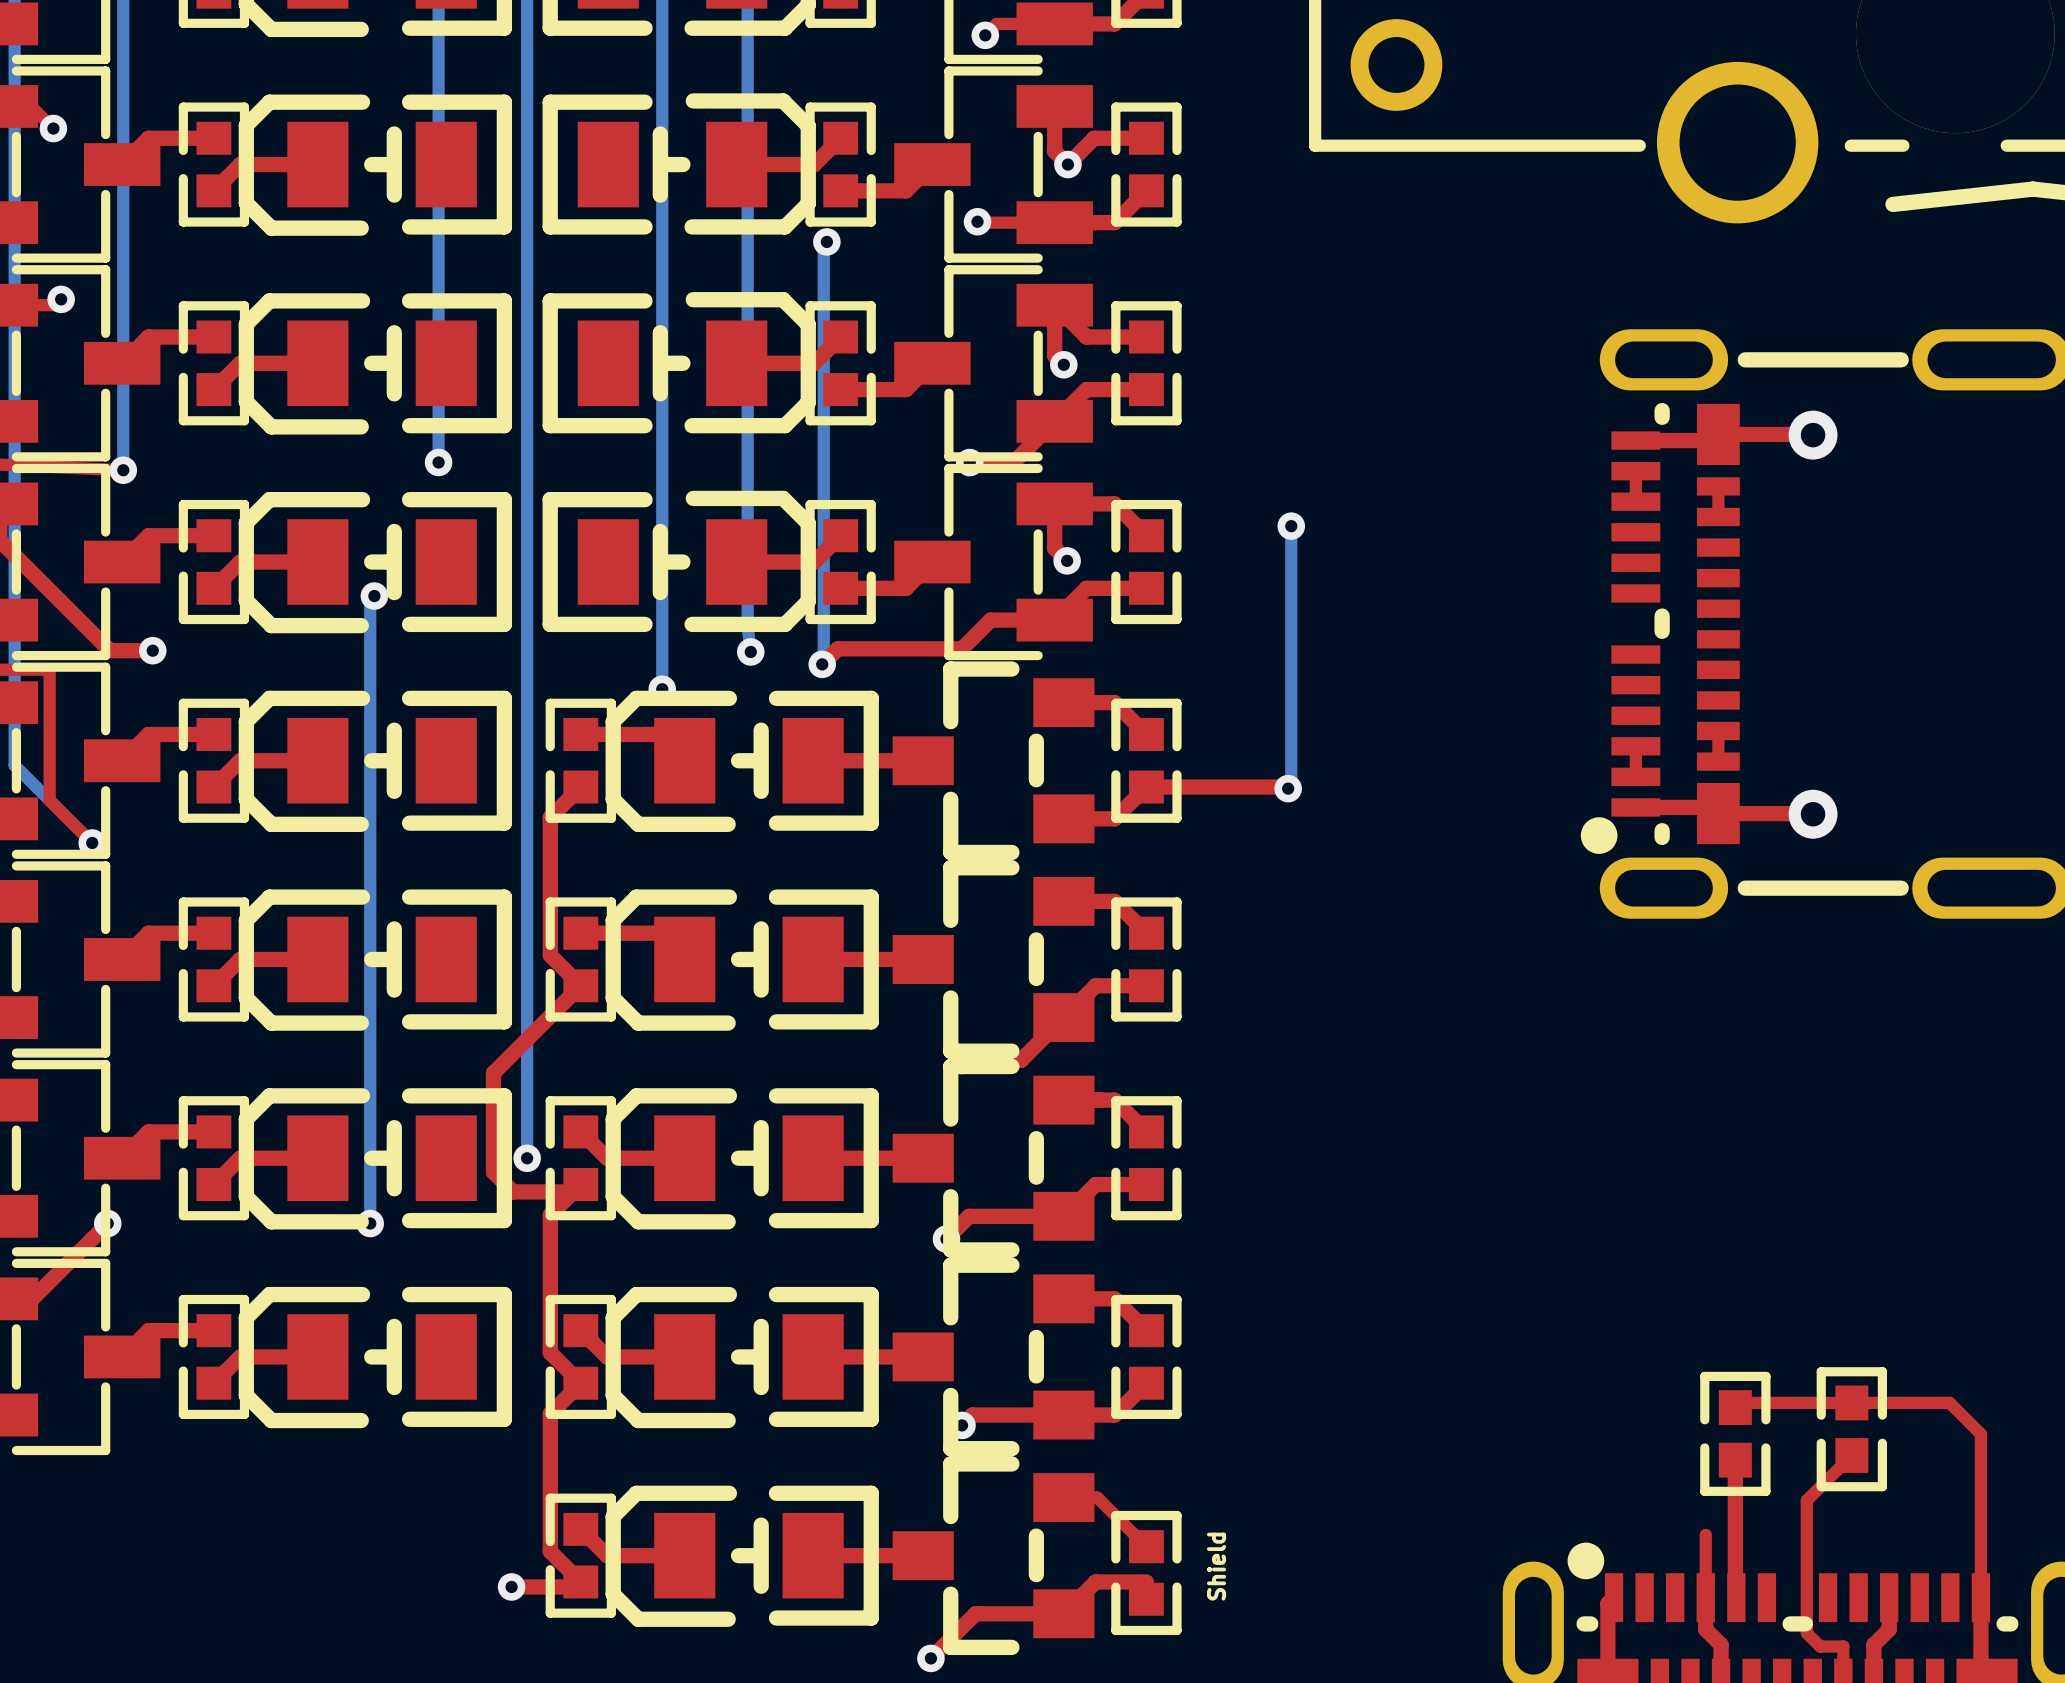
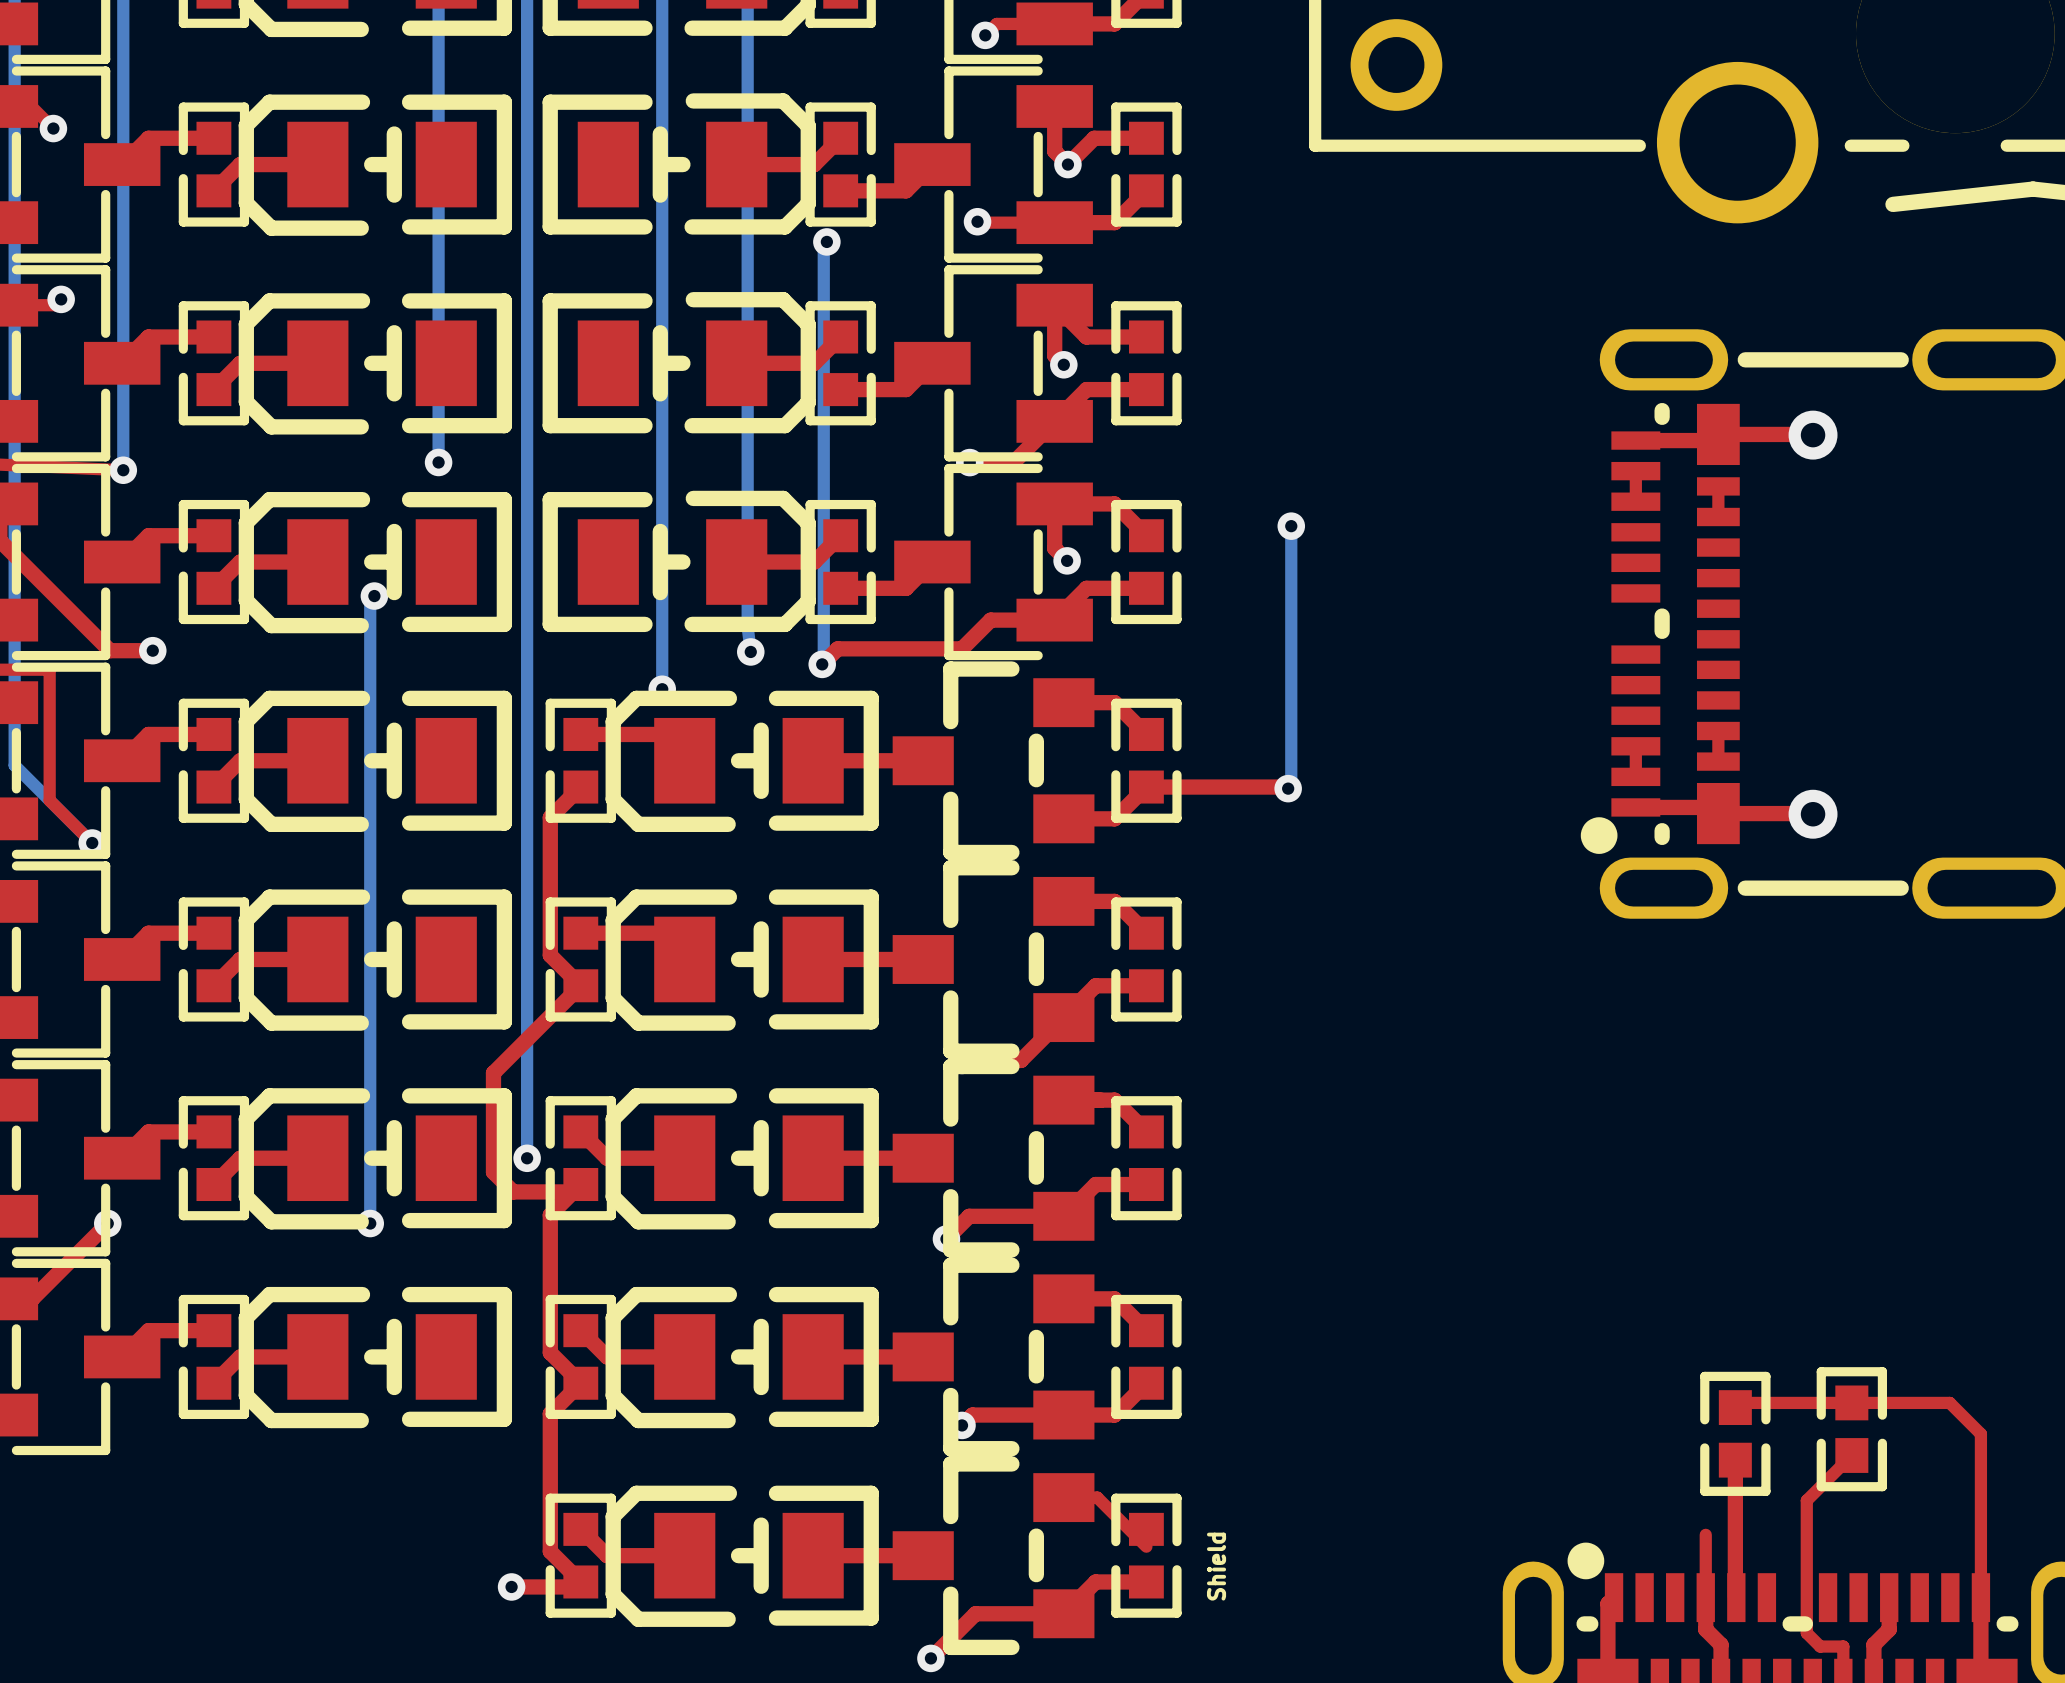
part position: (1146, 1572) -> (1146, 1555)

